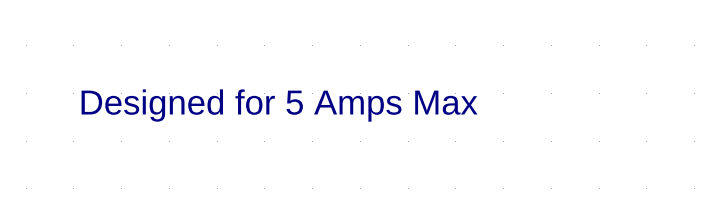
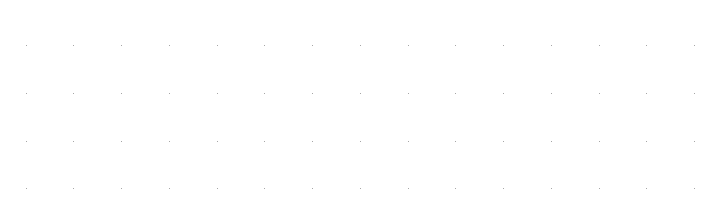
text: Designed for 5 Amps Max (279, 105) -> none

